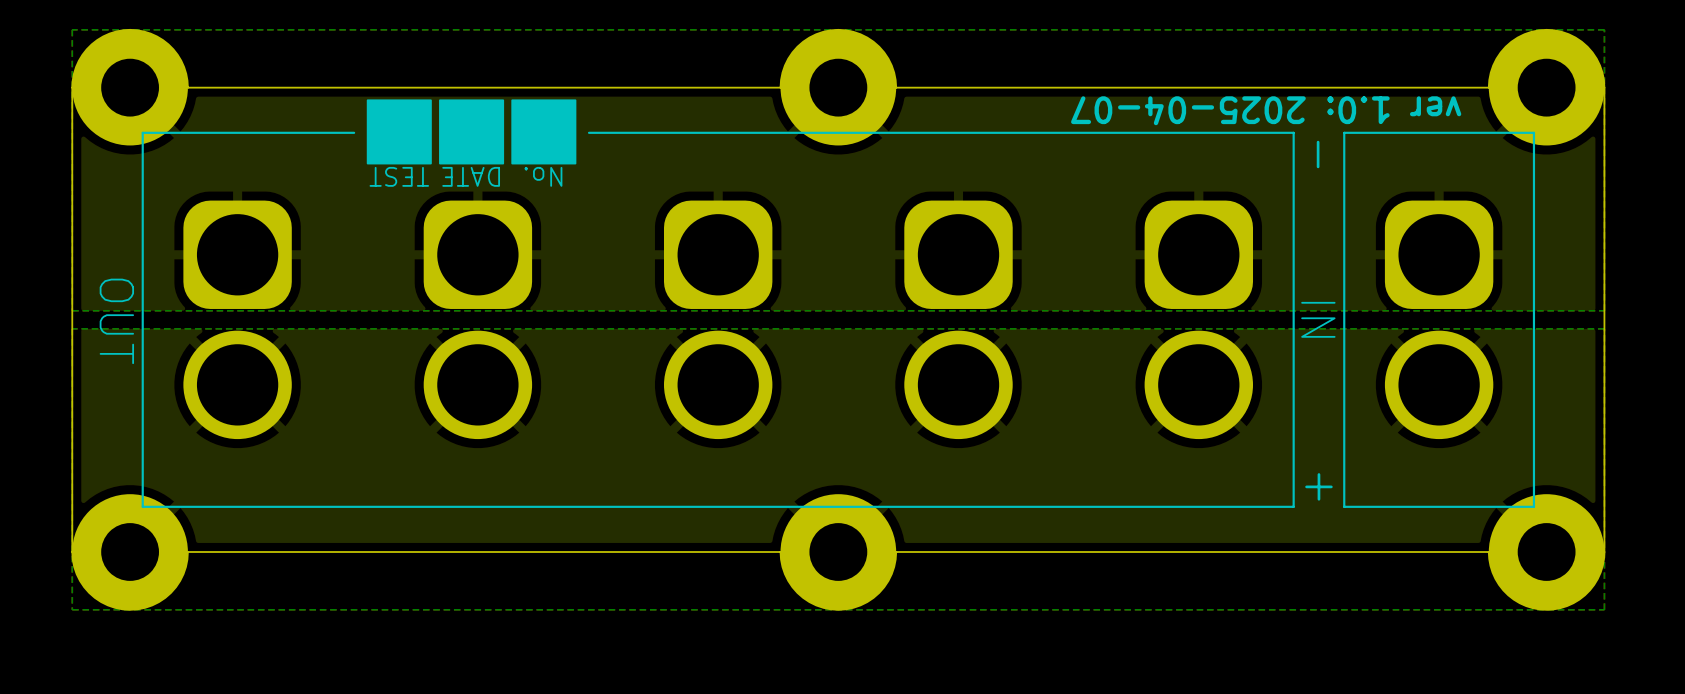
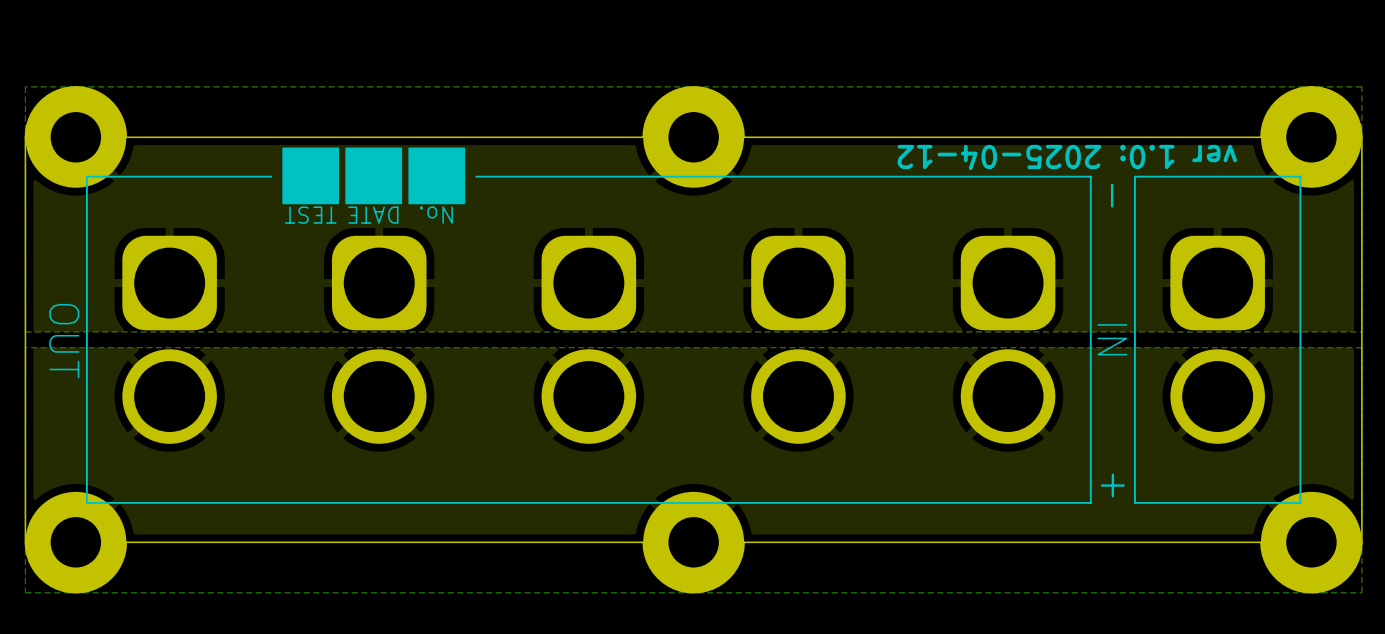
text: ver 1.0: 2025-04-07 (1266, 110) -> ver 1.0: 2025-04-12 (1067, 157)

